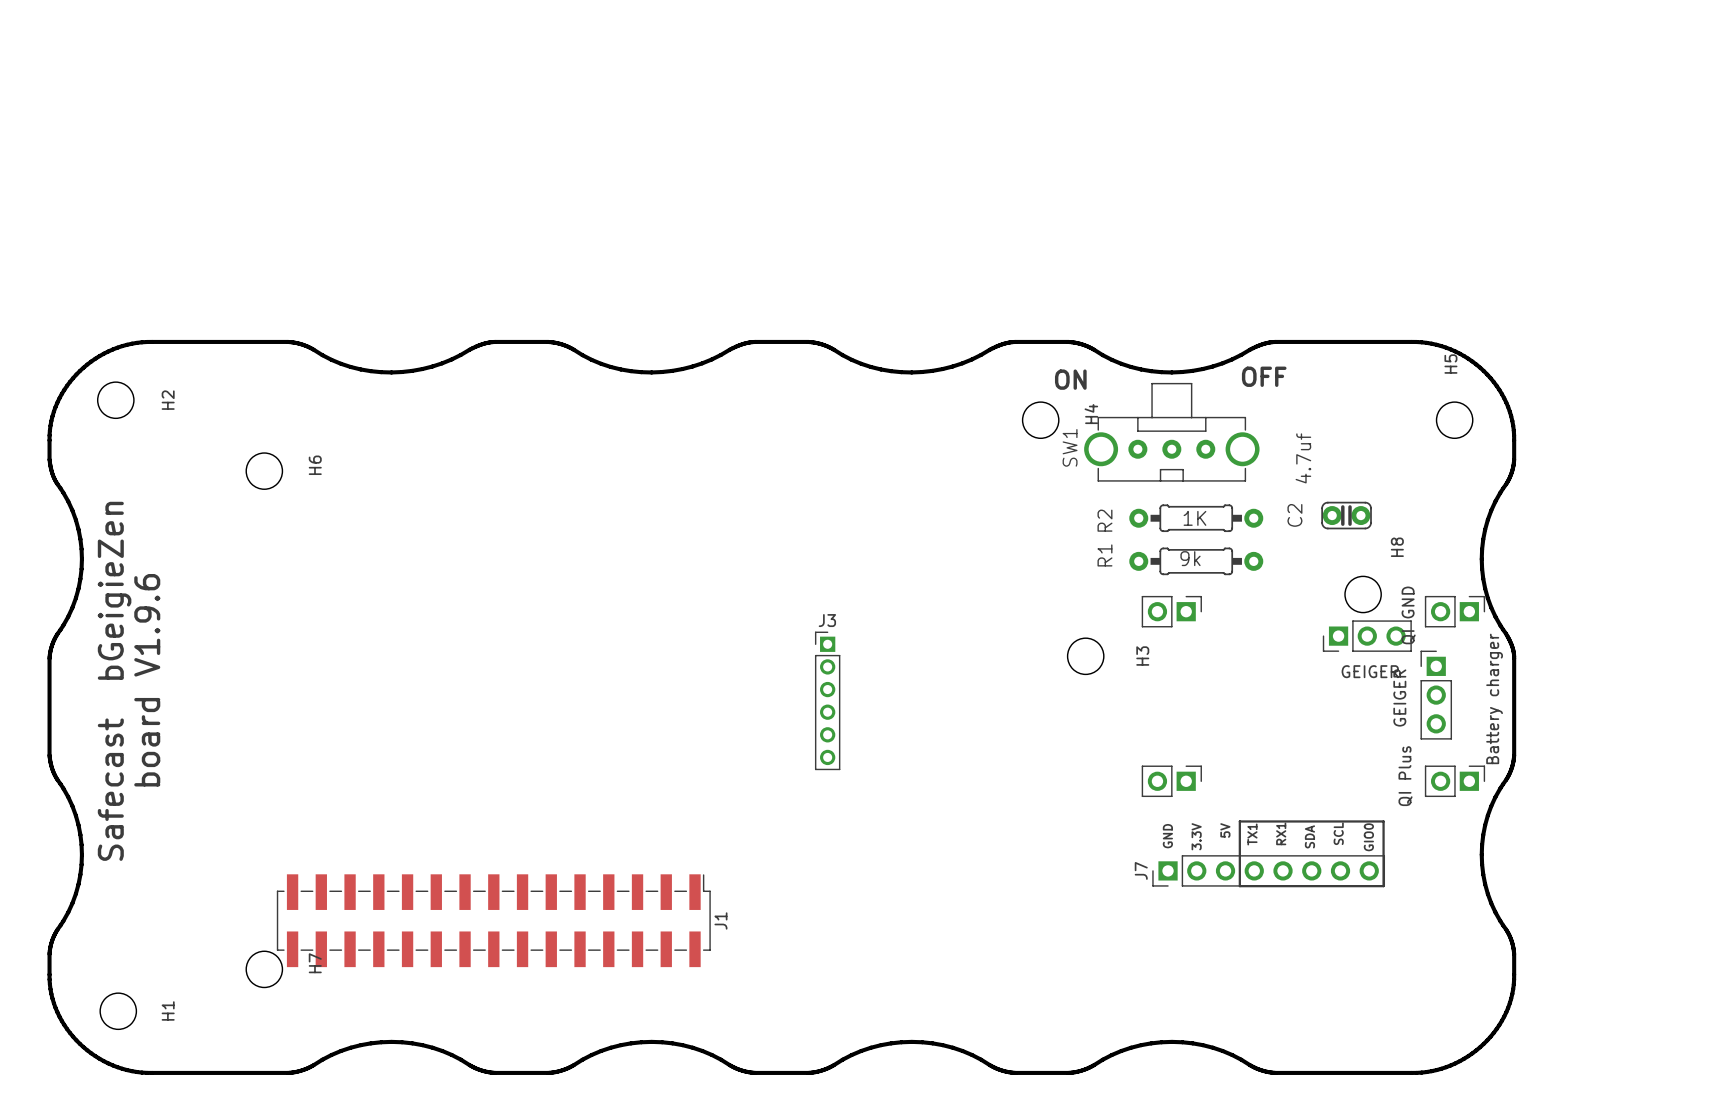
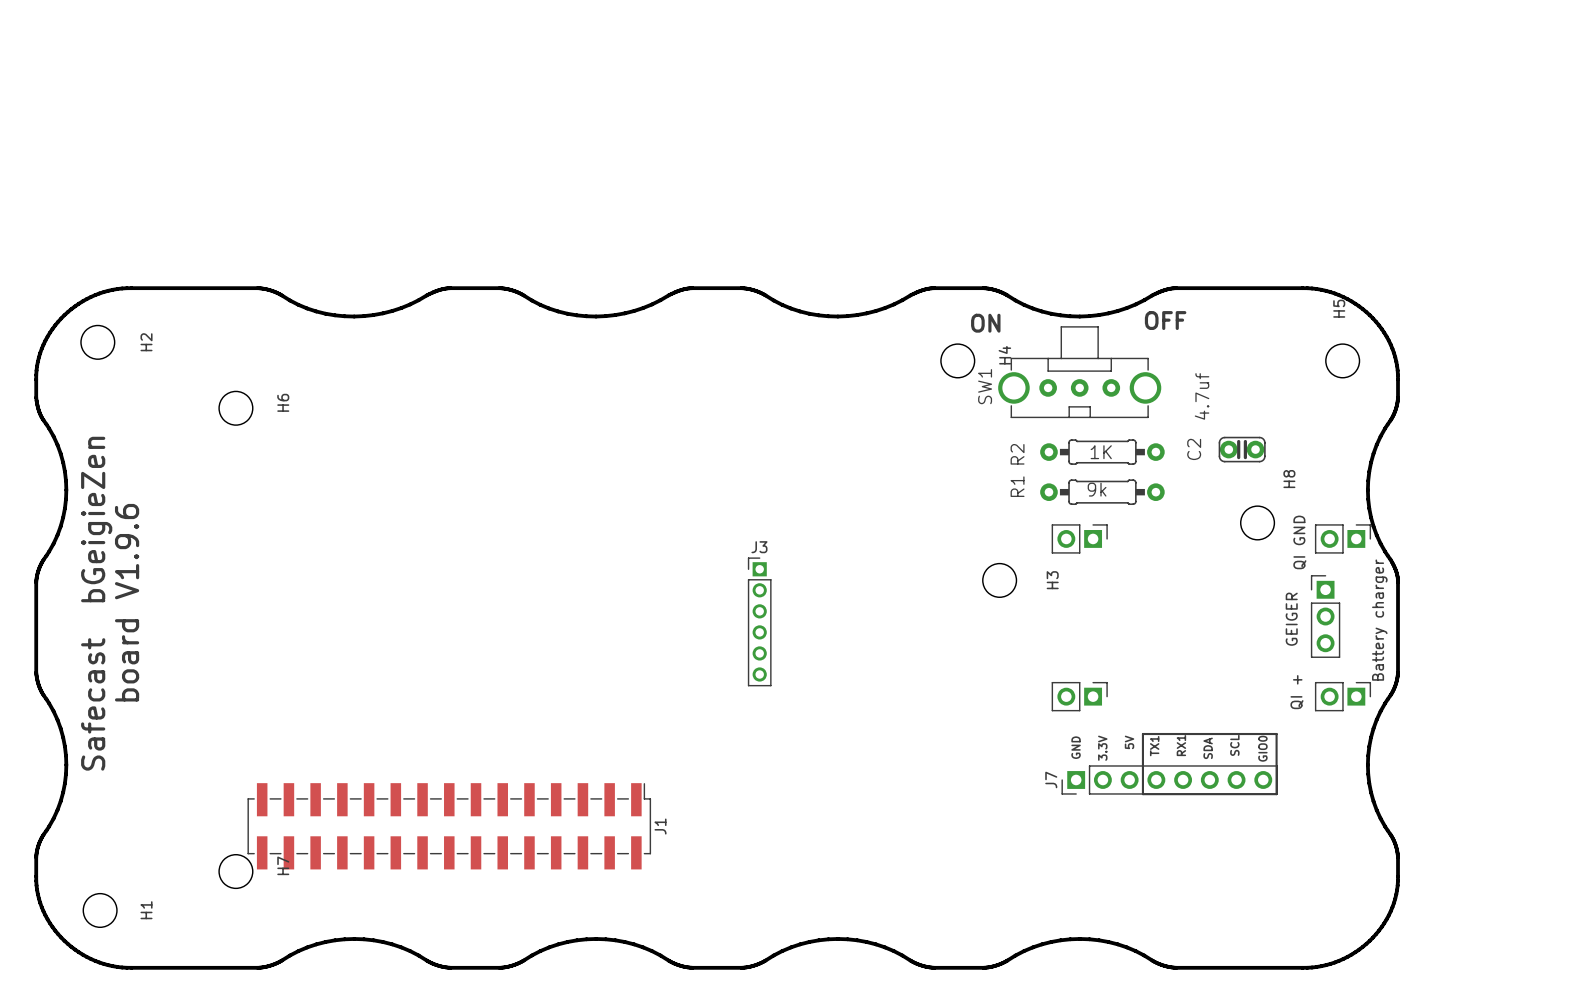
part: (1367, 636) -> none
part value: QI Plus (1405, 776) -> QI + (1296, 692)

